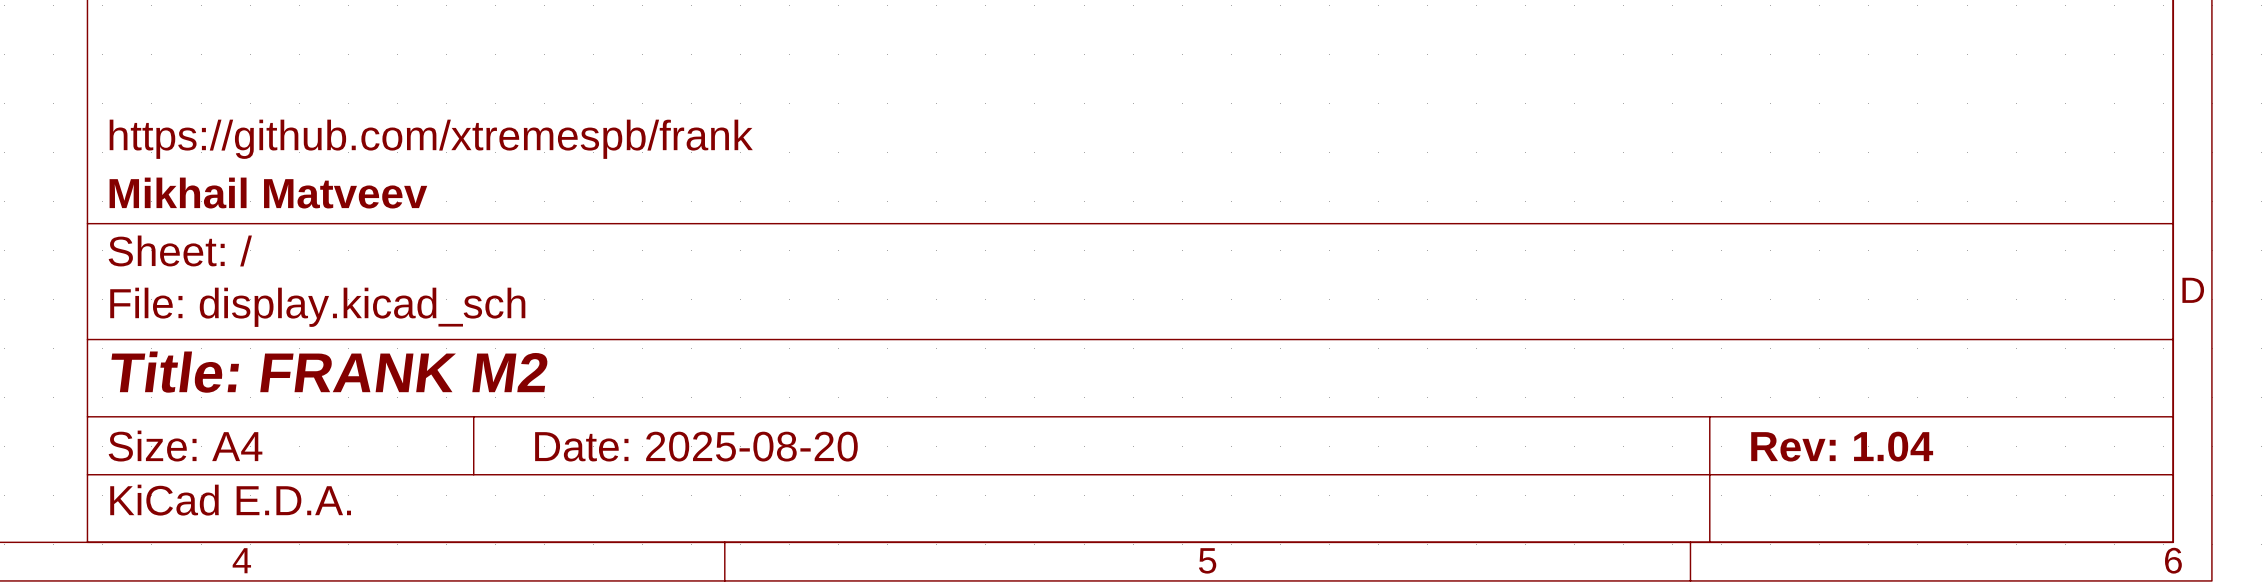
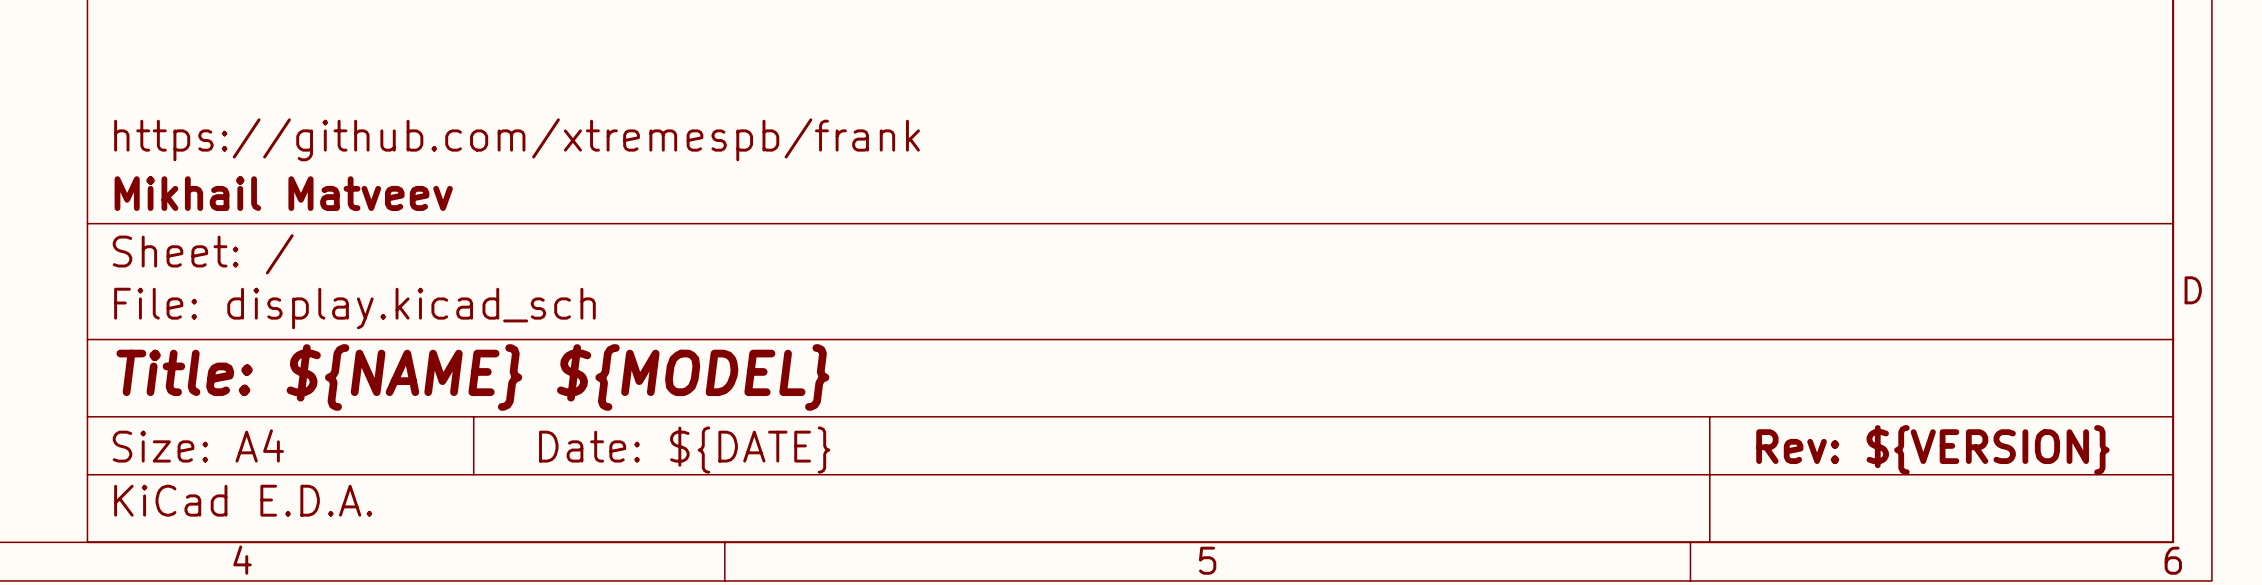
title block: Title: FRANK M2 (329, 372) -> Title: ${NAME} ${MODEL} (472, 377)
title block: Date: 2025-08-20 (696, 446) -> Date: ${DATE} (684, 450)
title block: Rev: 1.04 (1842, 446) -> Rev: ${VERSION} (1932, 450)

